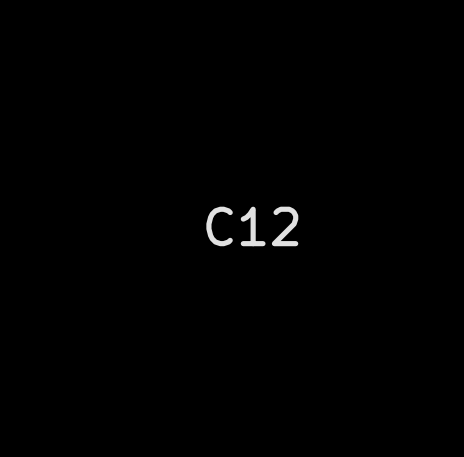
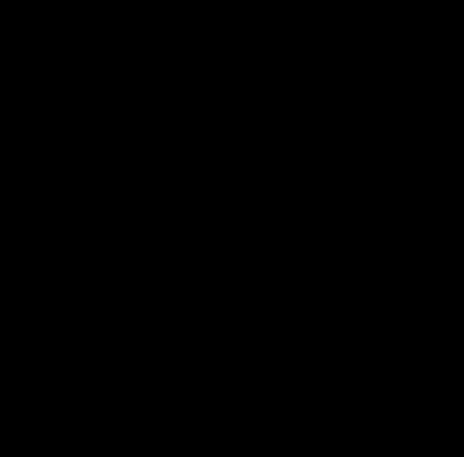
drawing: [206, 206, 299, 247] -> none

